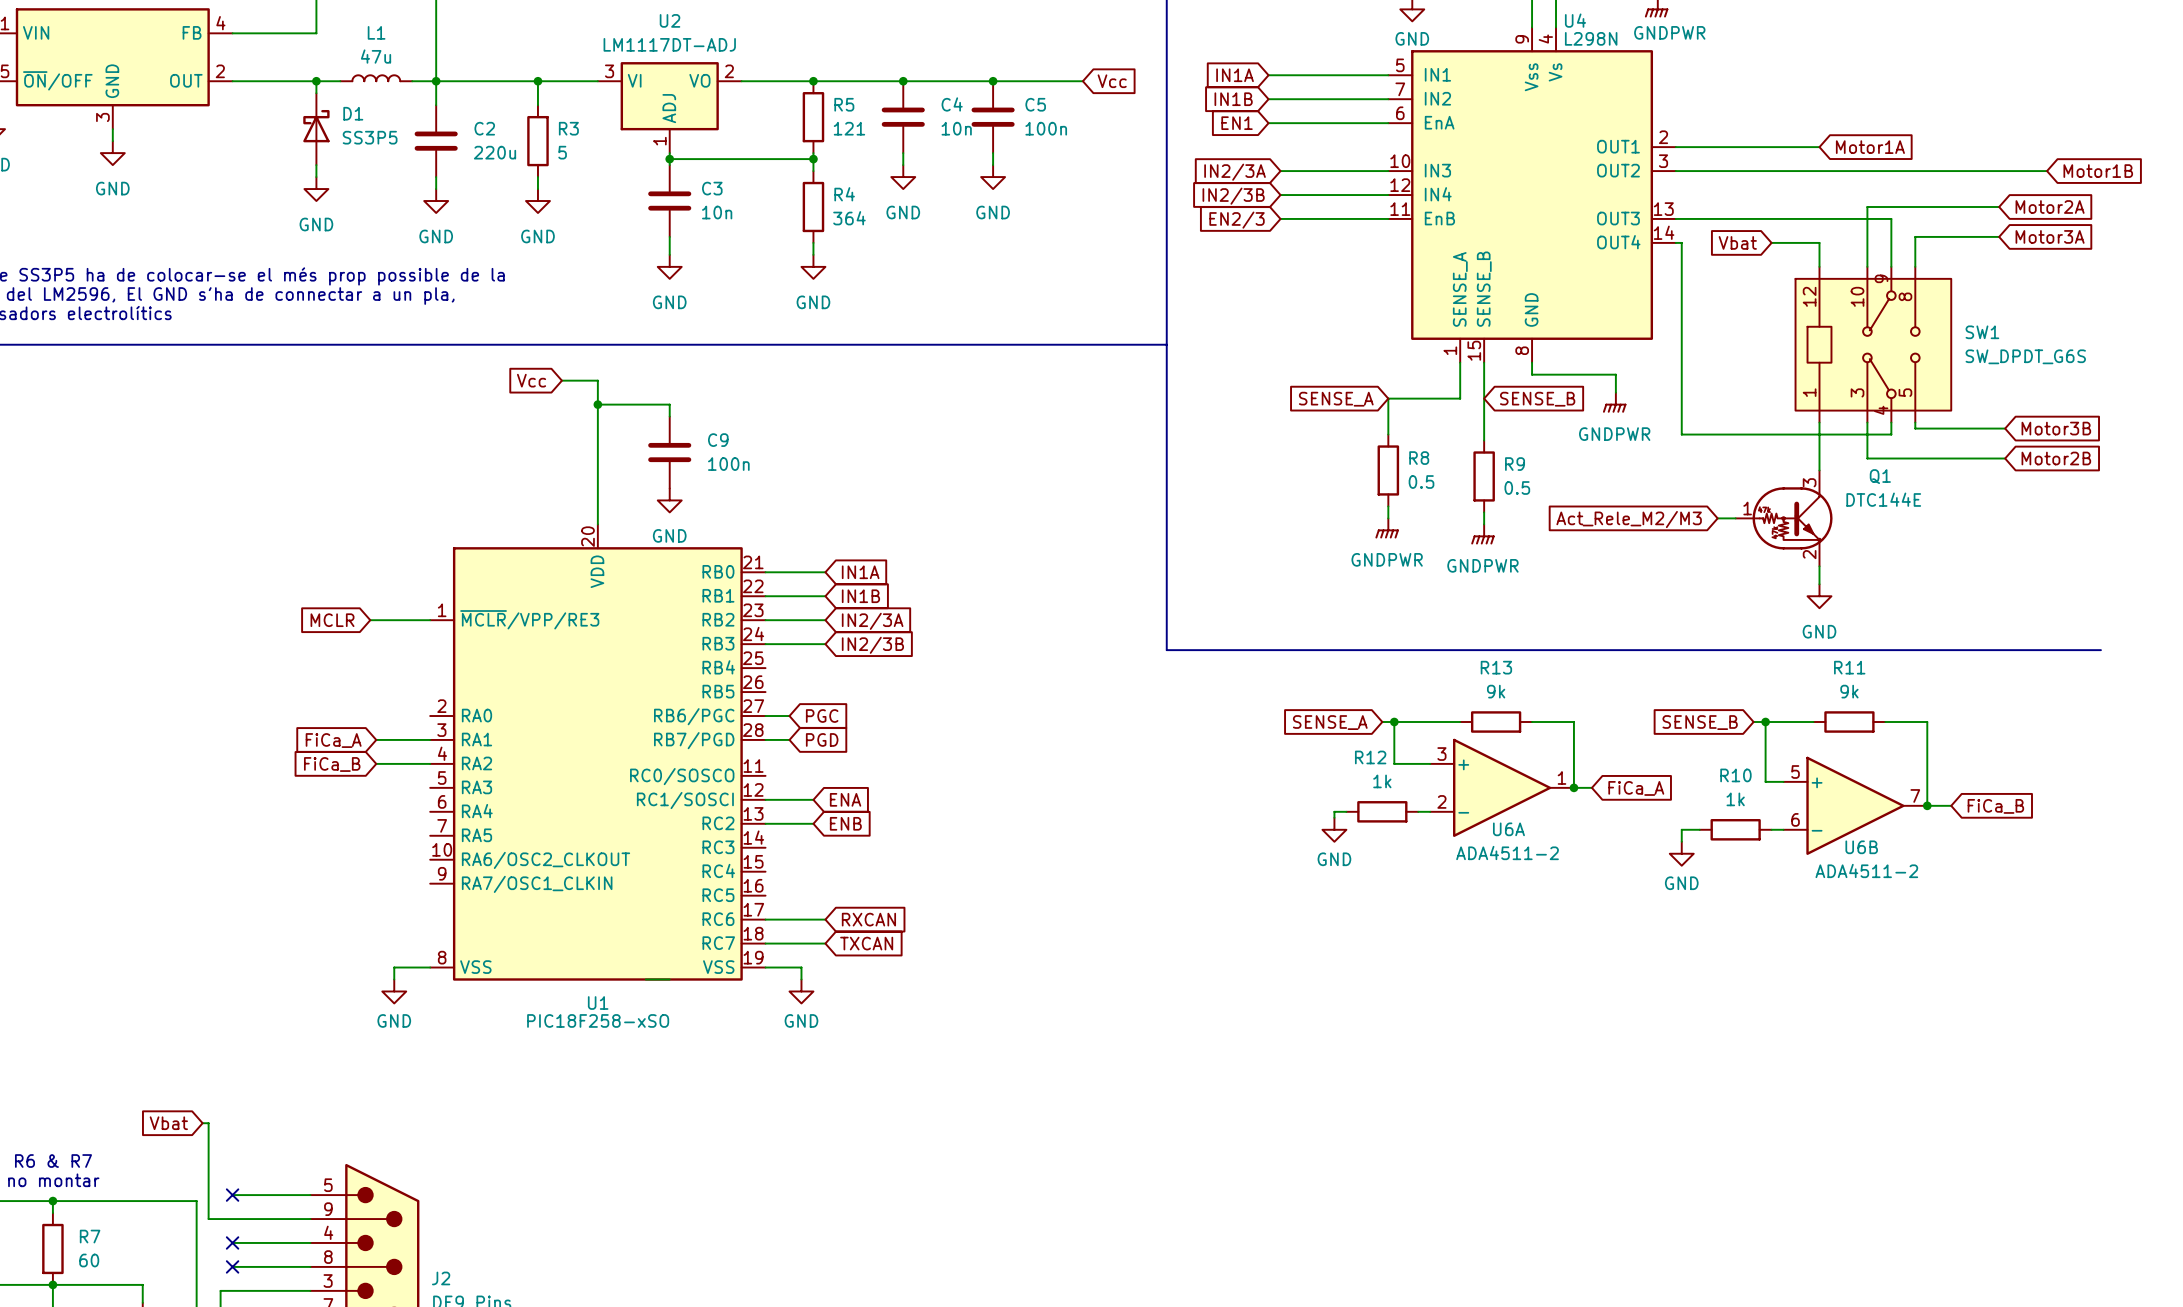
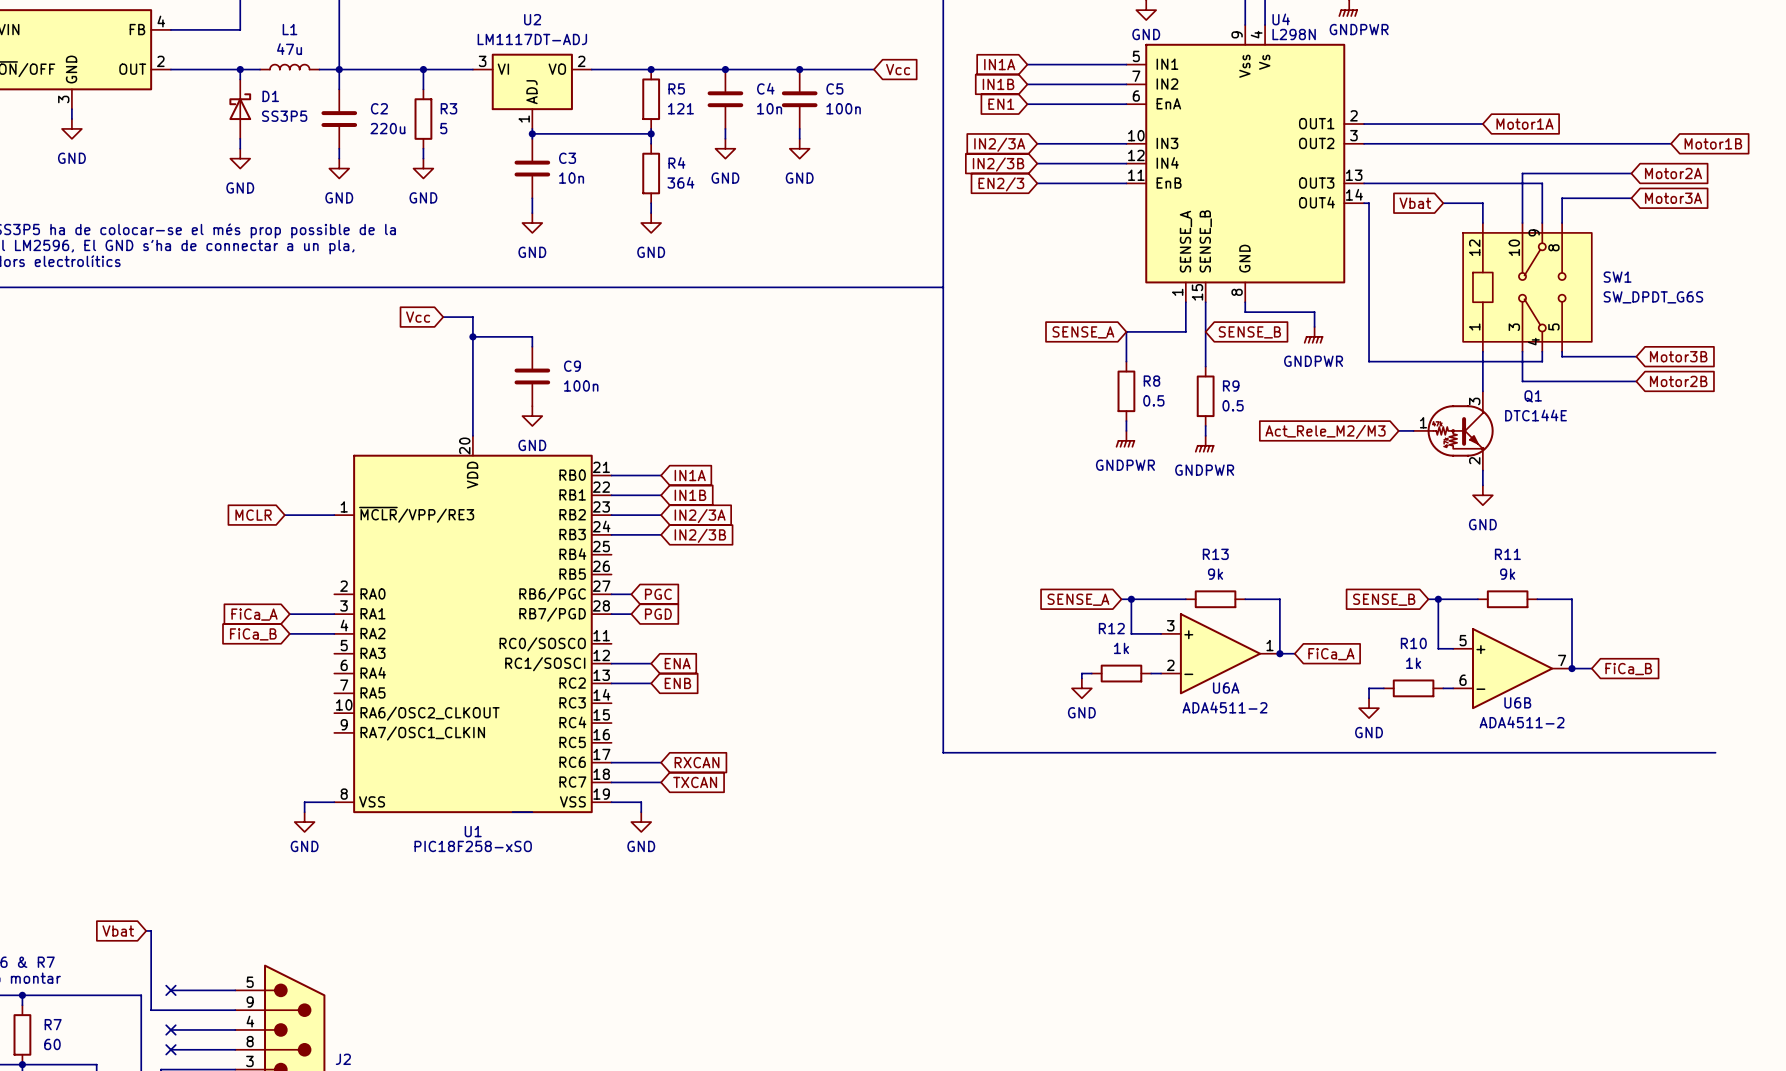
line: (1166, 650) (2100, 650) -> (943, 539) (943, 752) (1715, 752)

